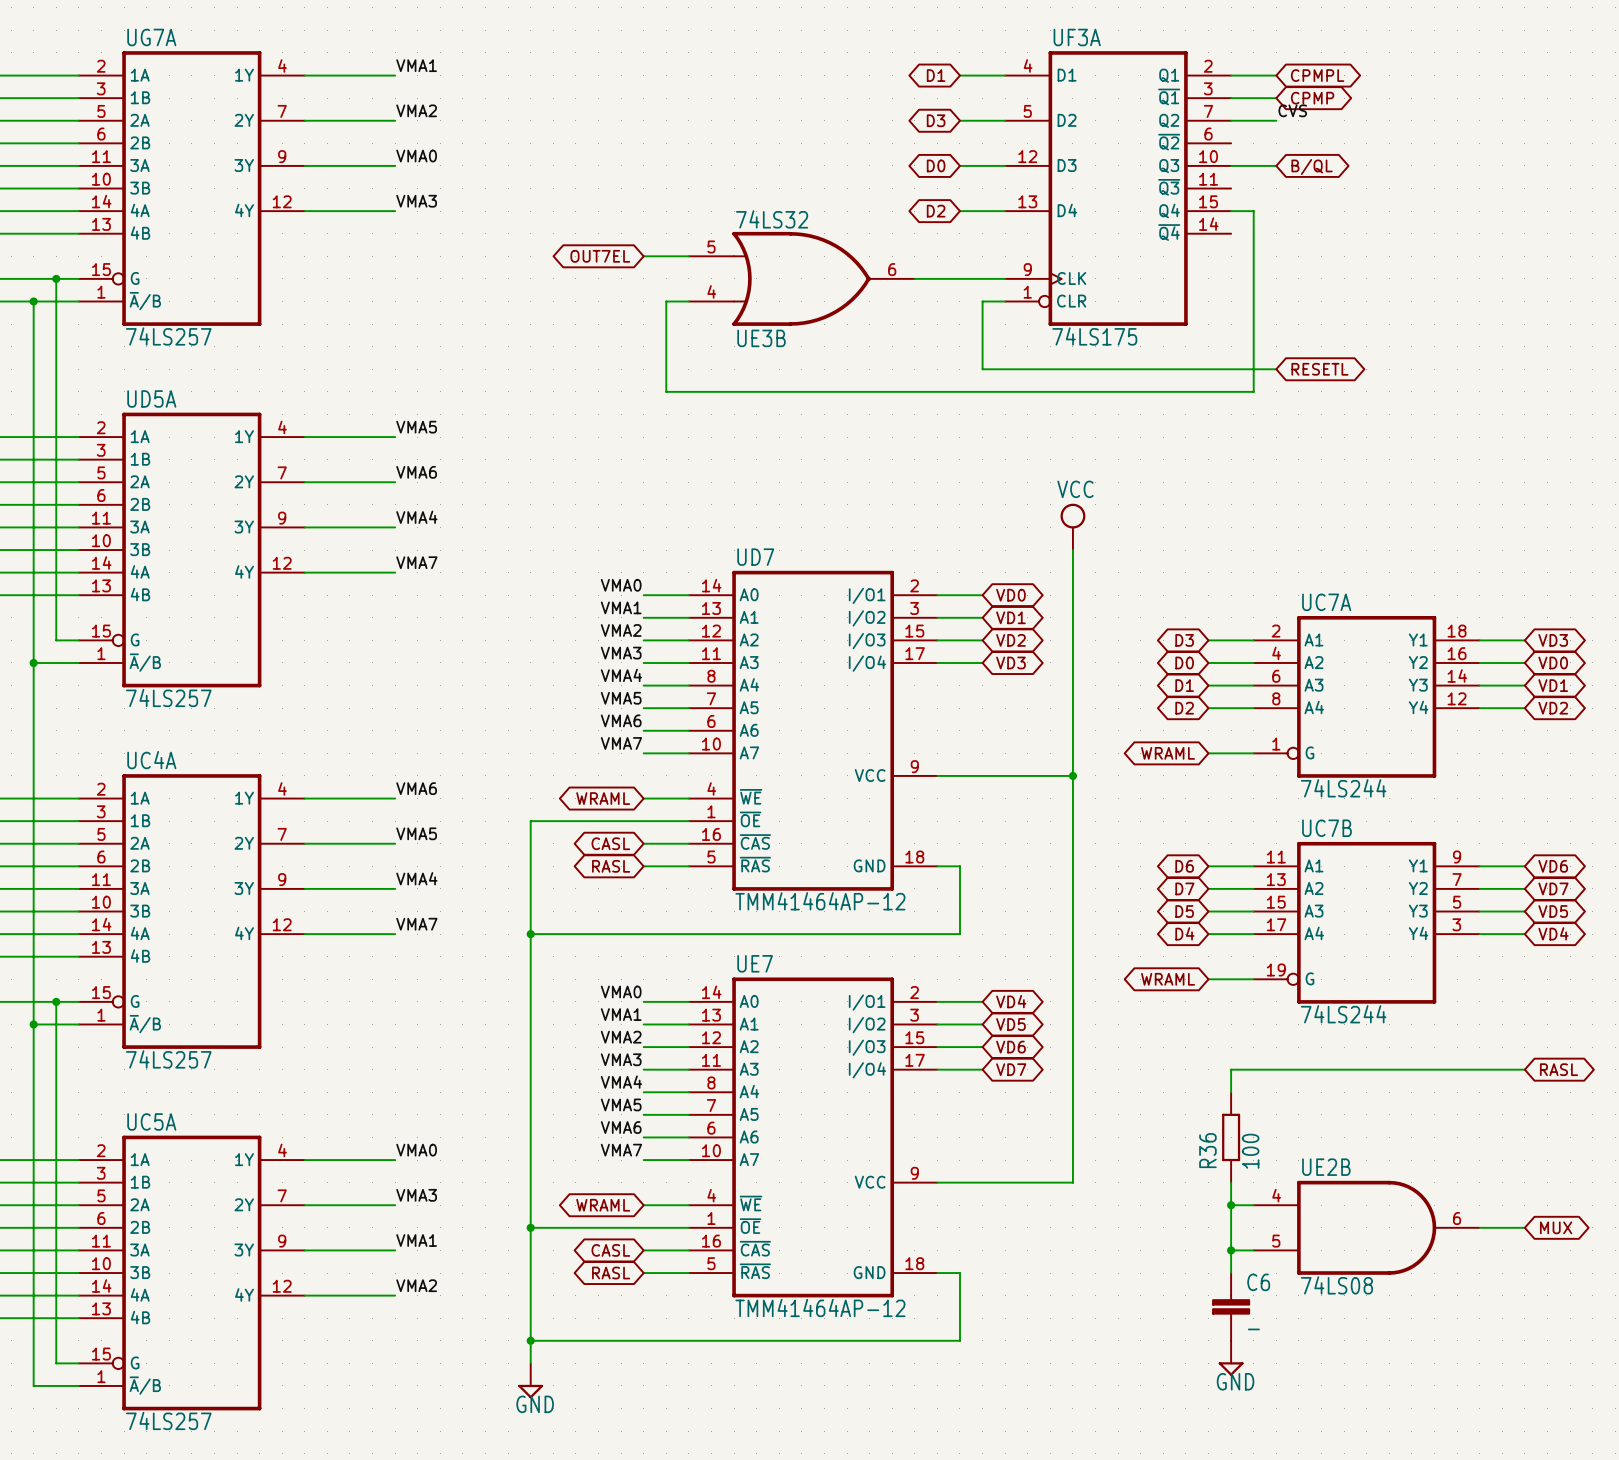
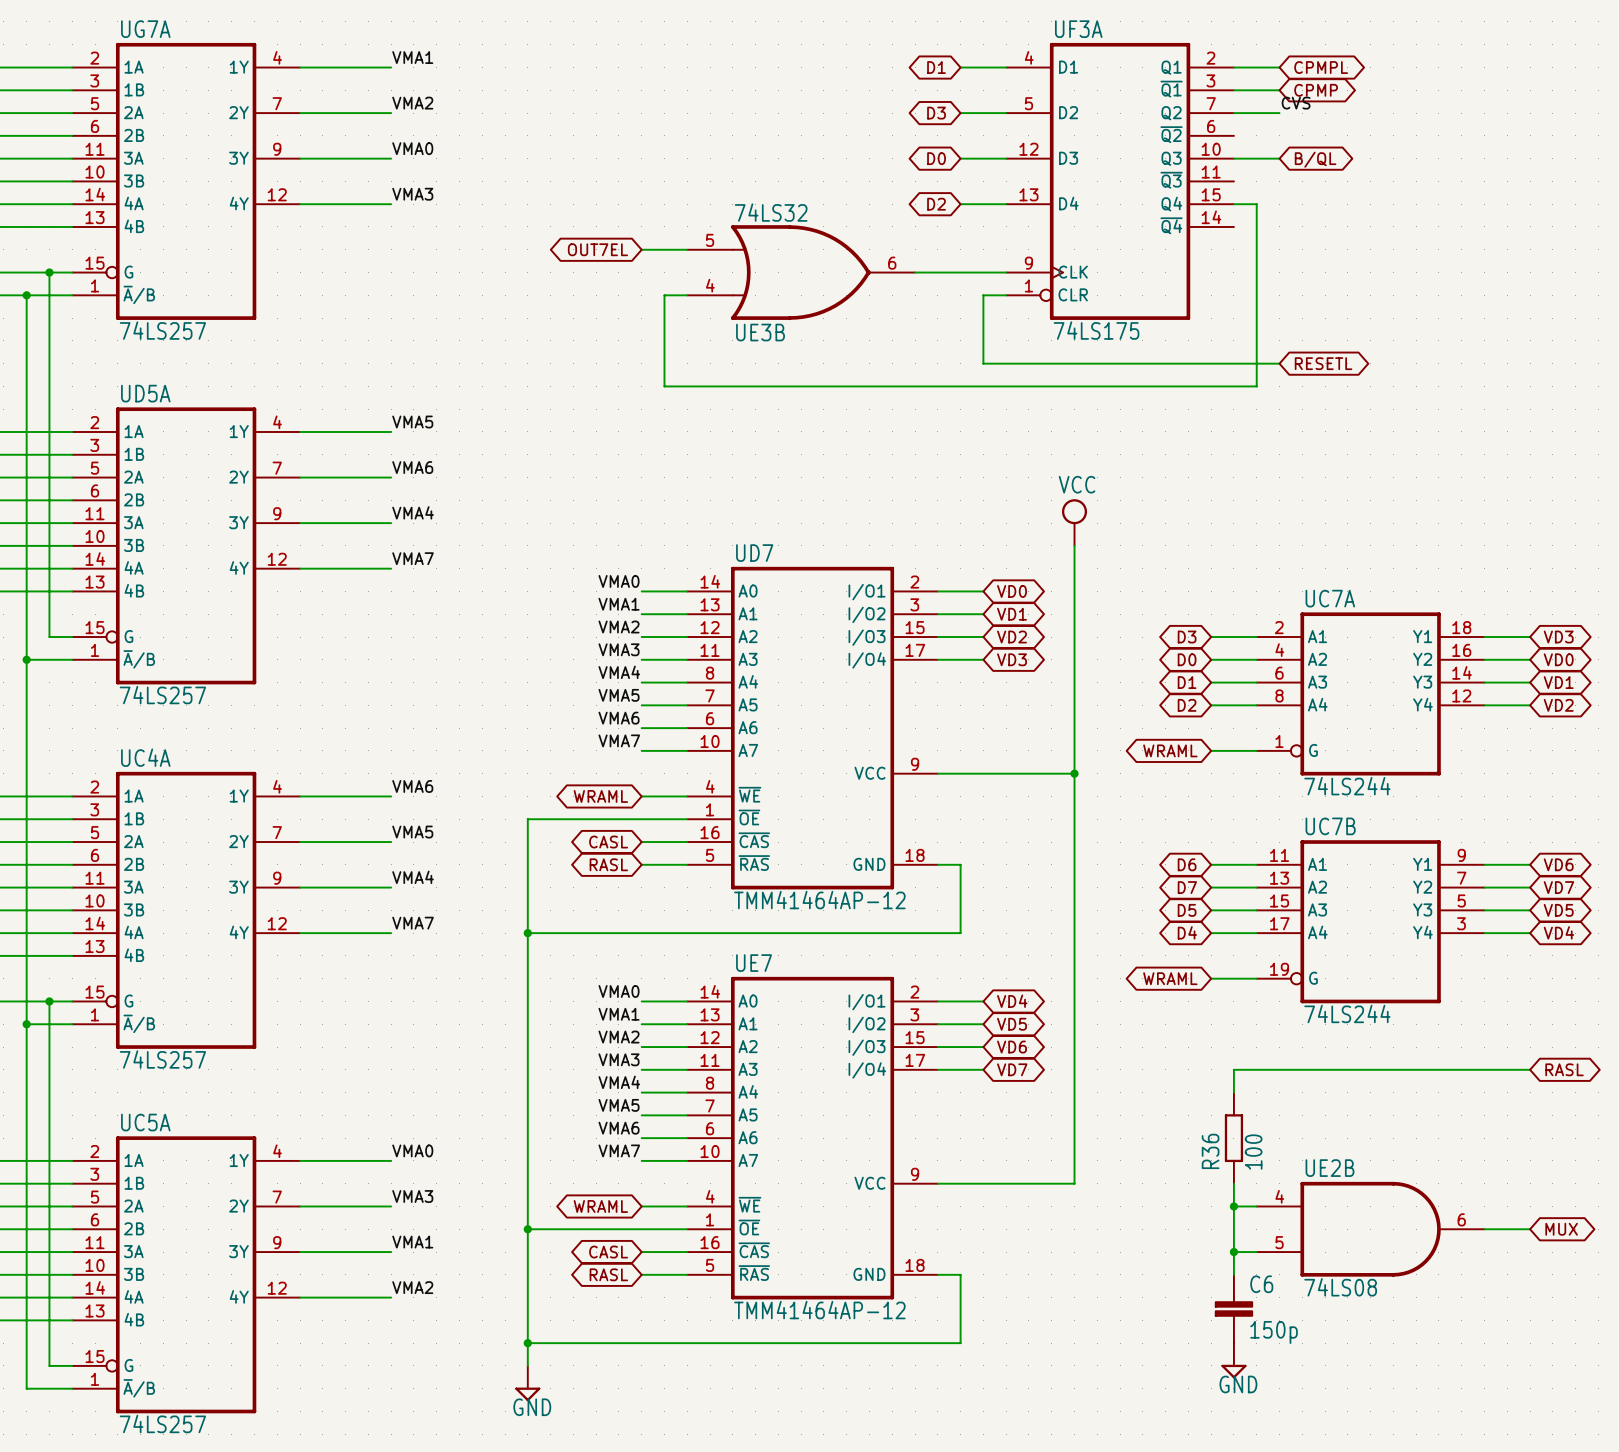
C6 value: - (1253, 1329) -> 150p (1274, 1332)

